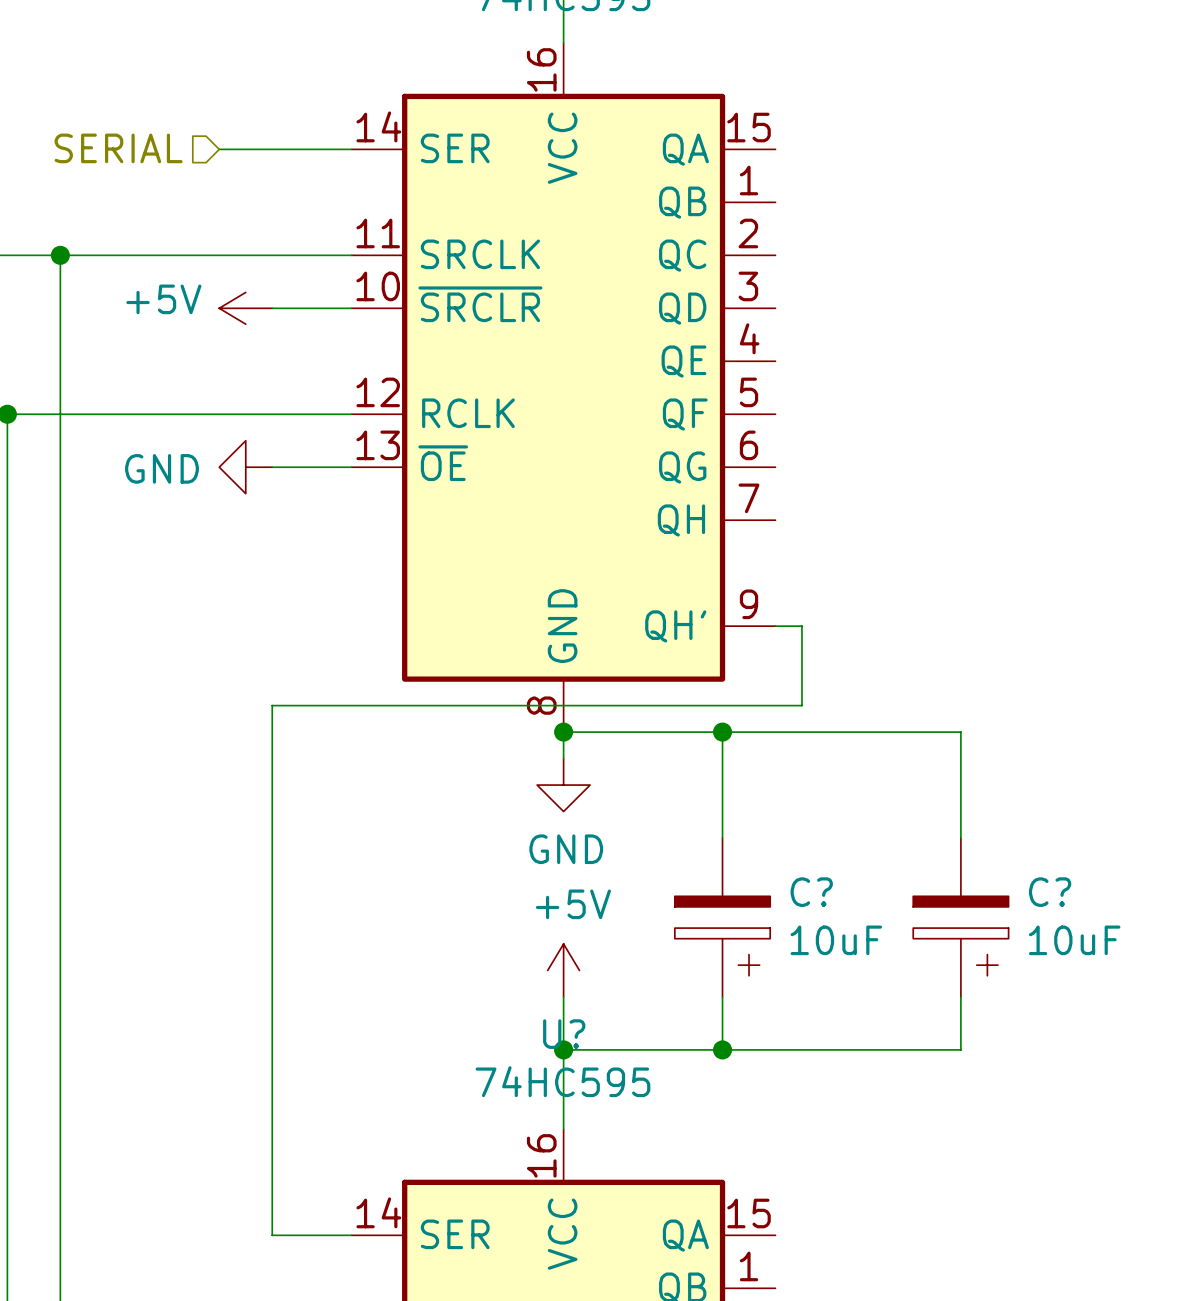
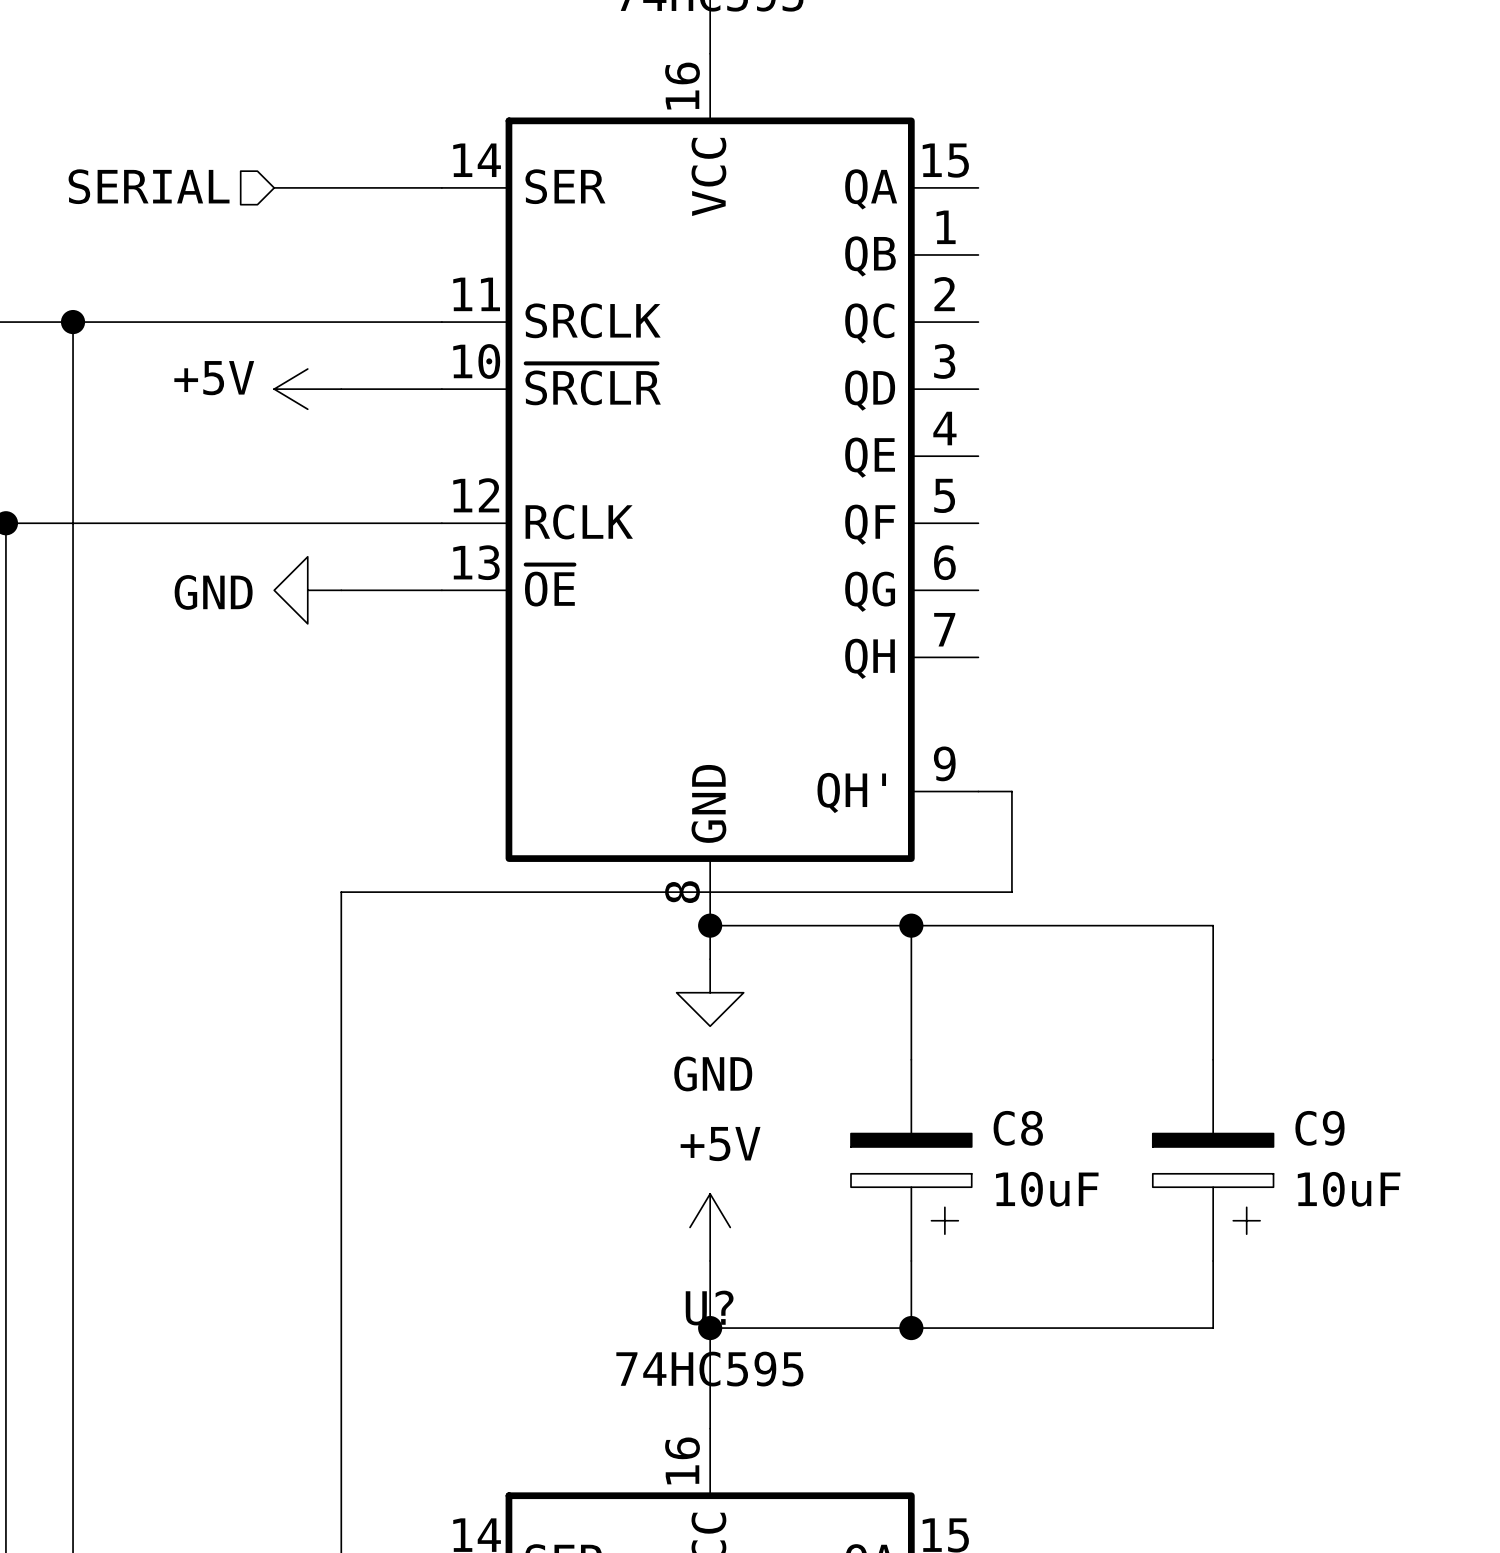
C? name: C? (811, 892) -> C8 (1018, 1128)
C? name: C? (1050, 892) -> C9 (1319, 1128)

